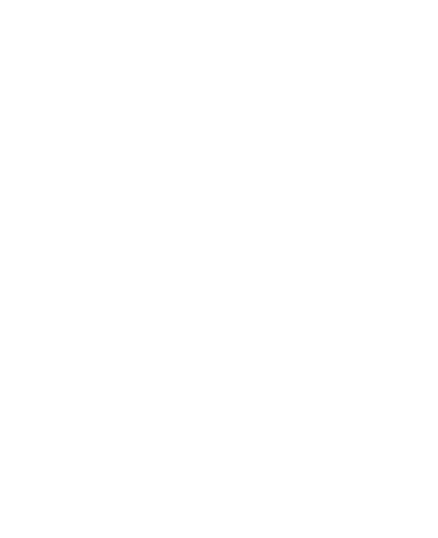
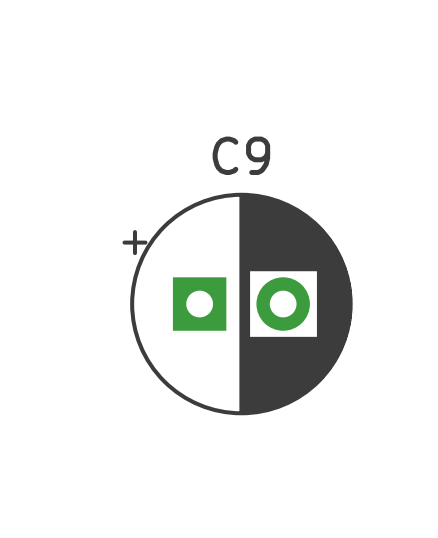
C9: none -> (237, 304)

